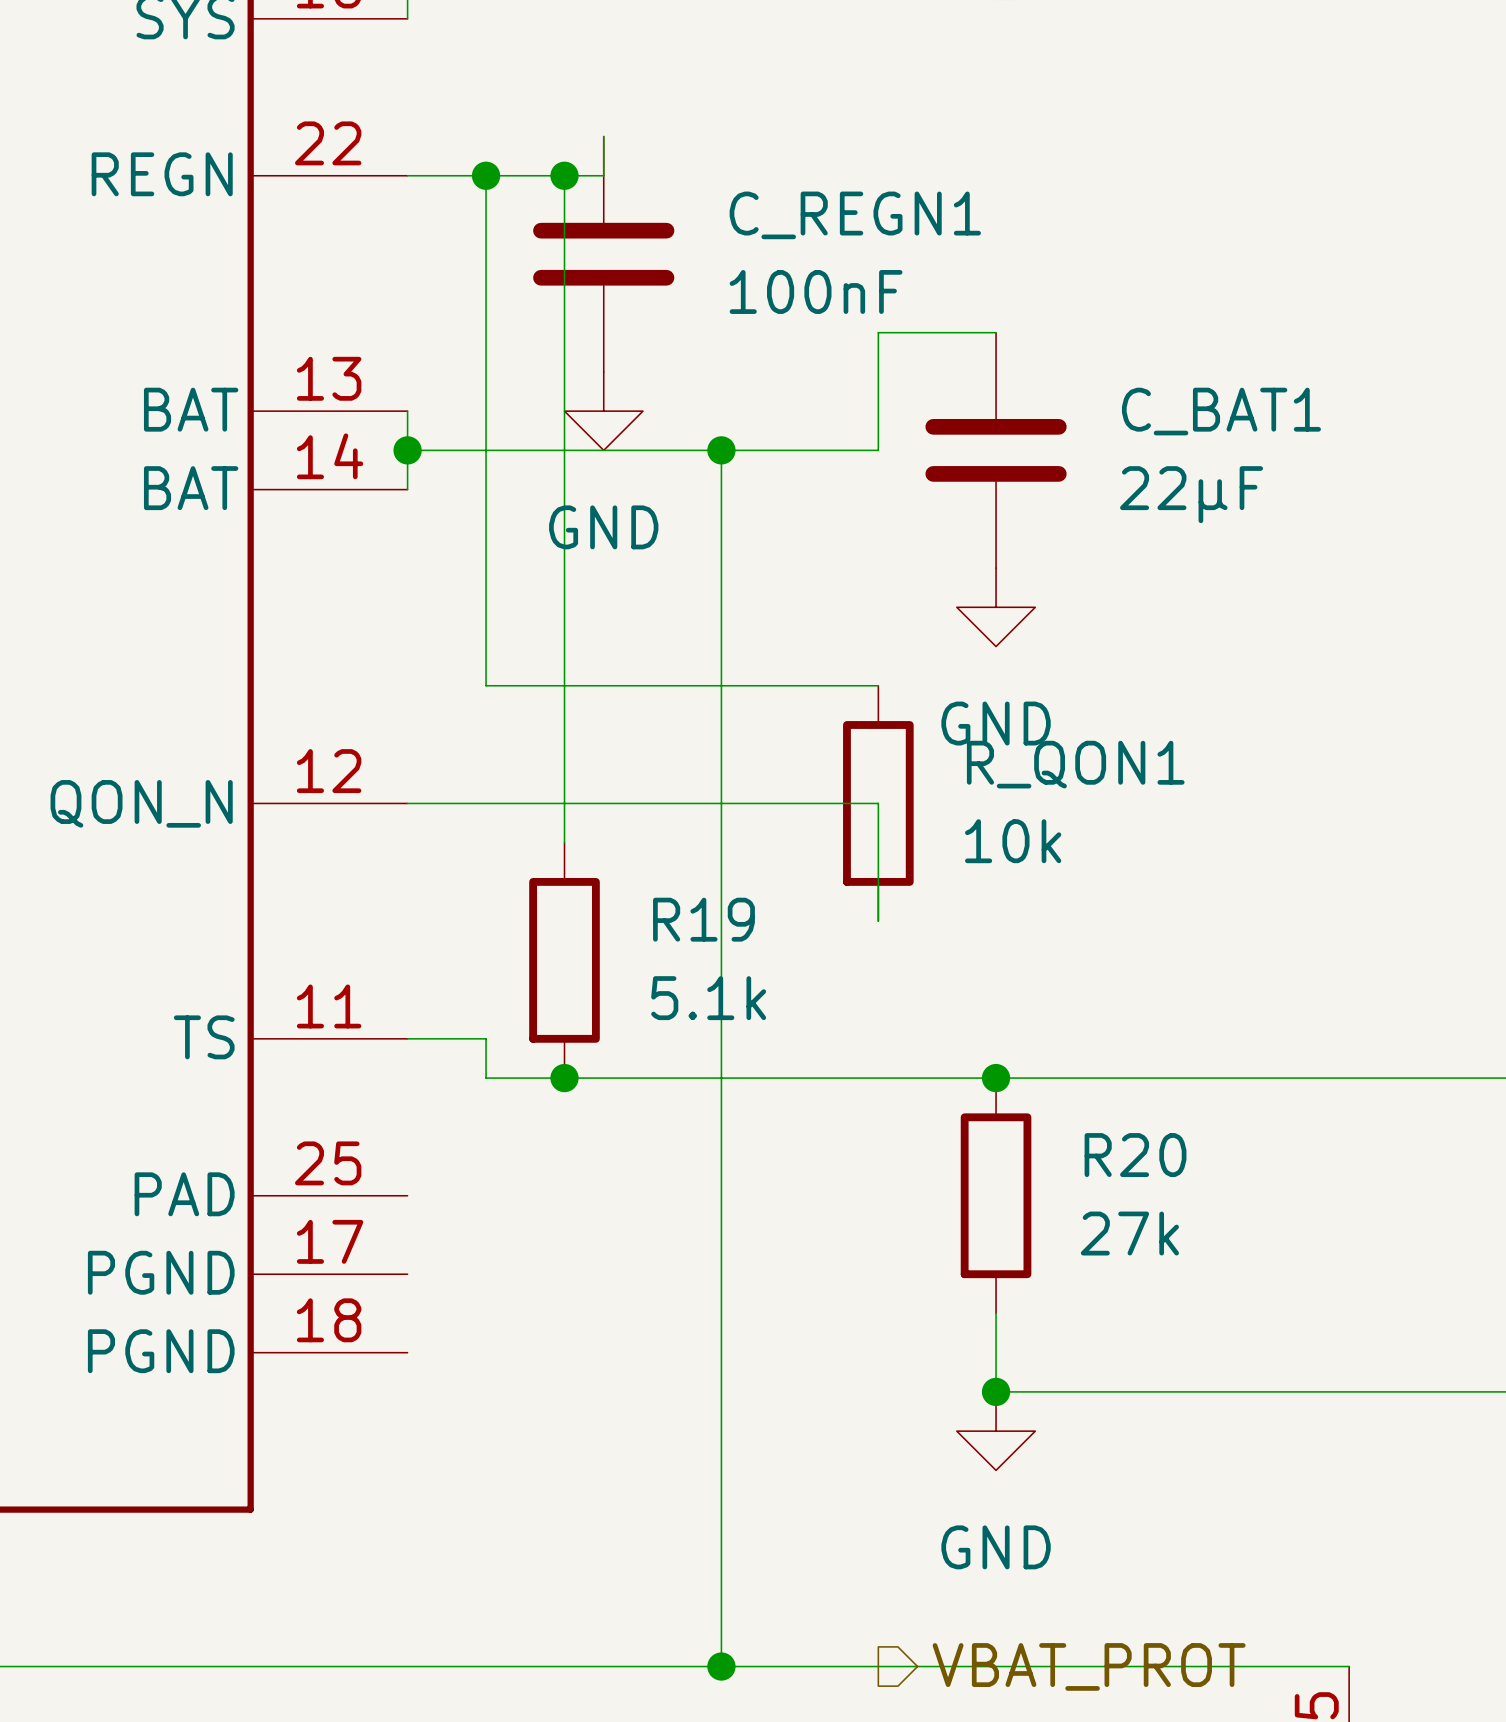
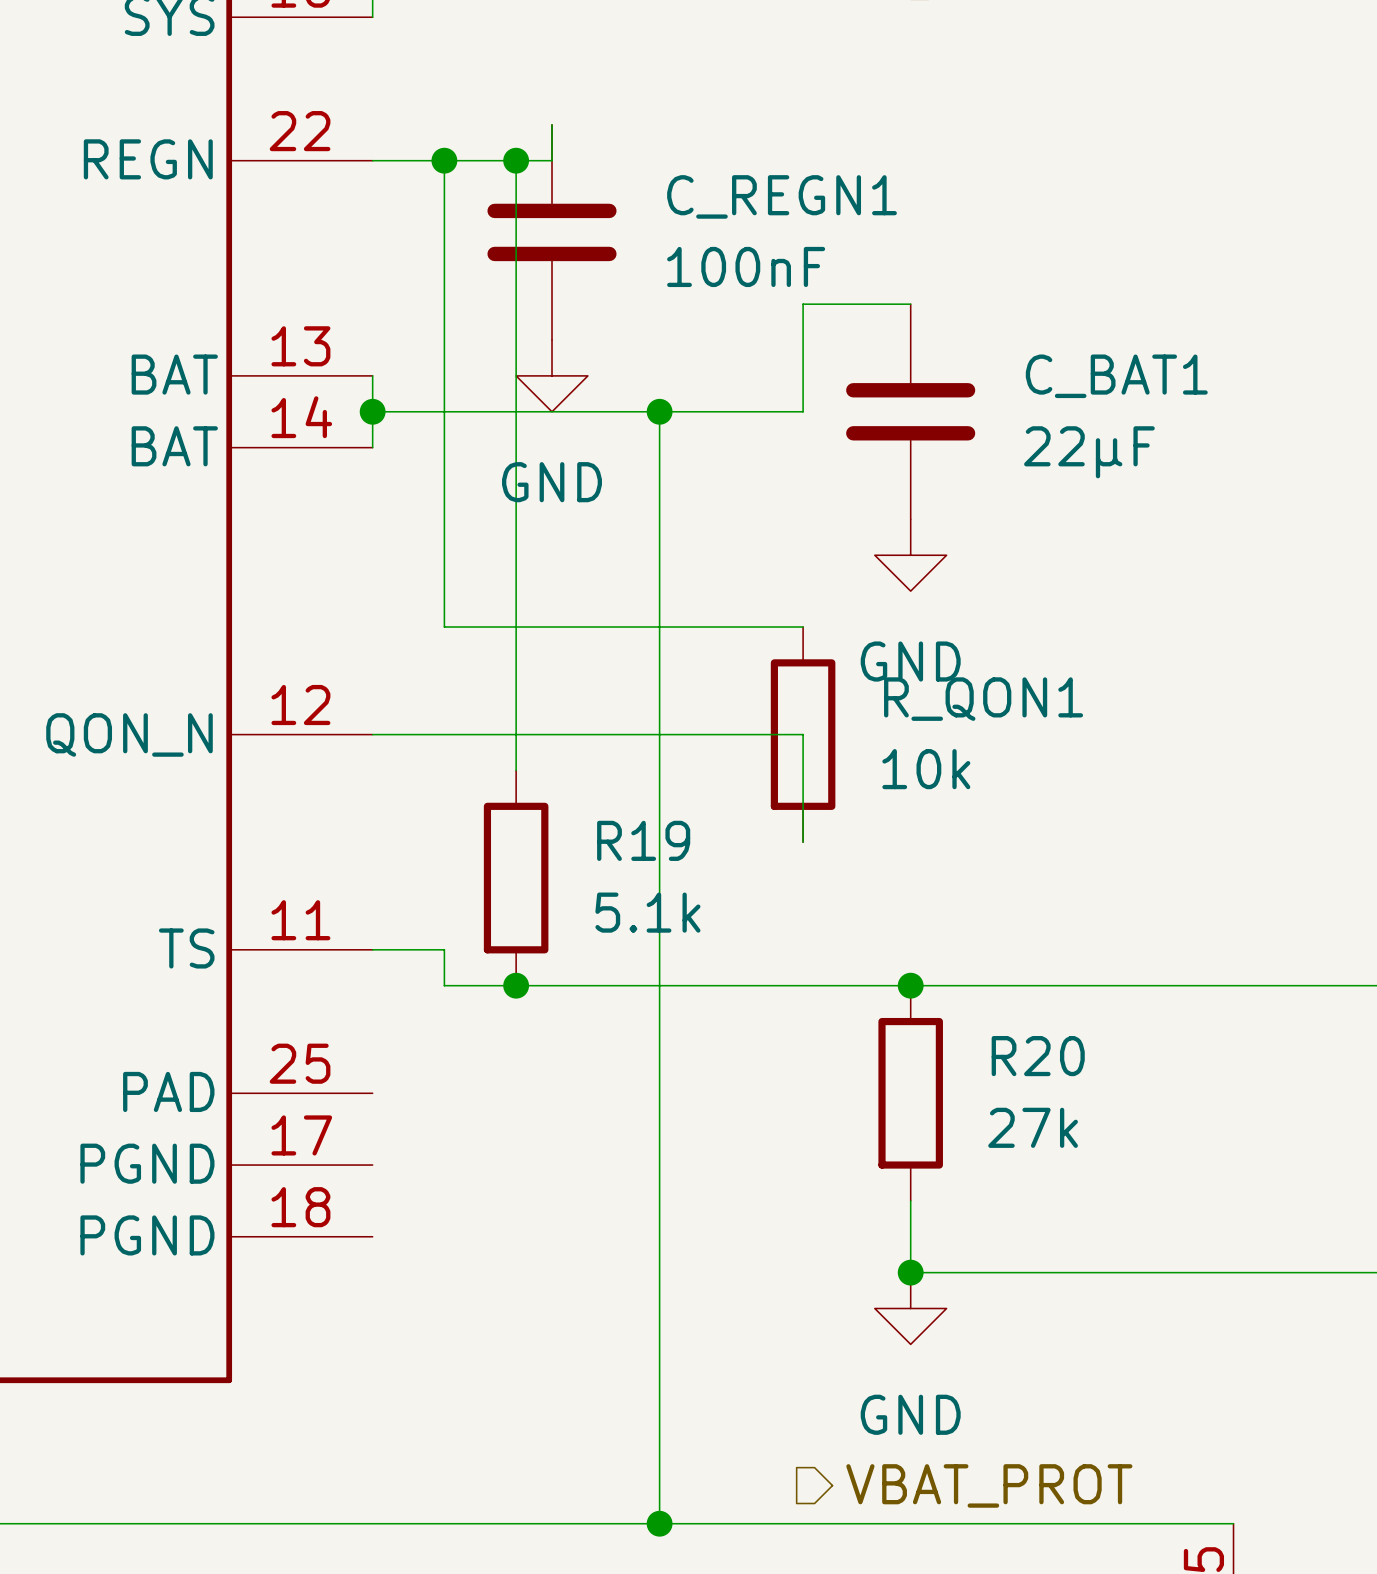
hierarchical label position: VBAT_PROT (1089, 1666) -> VBAT_PROT (989, 1485)

